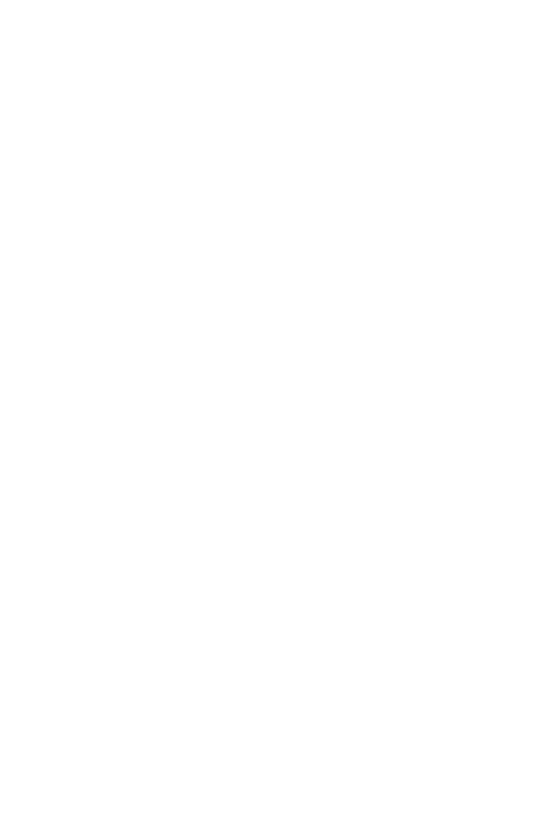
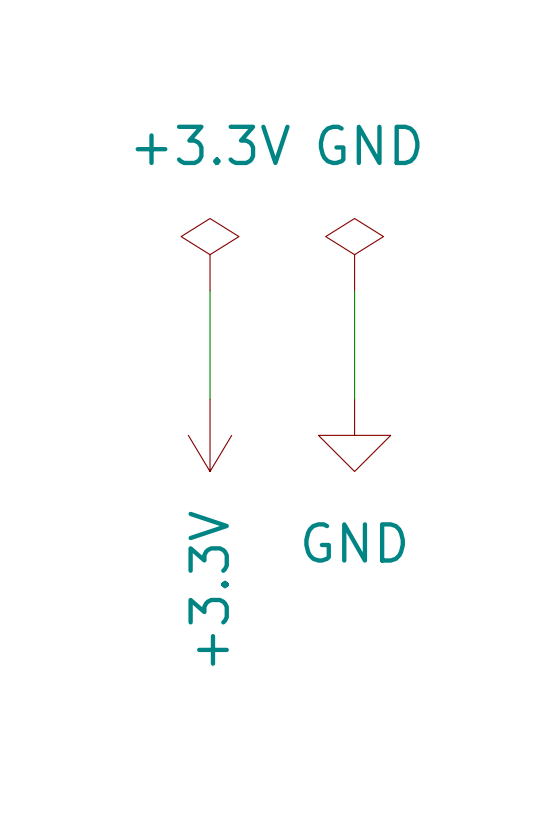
power symbol: none -> +3.3V (210, 254)
power symbol: none -> GND (354, 254)
wire: none -> (210, 290) (210, 399)
wire: none -> (354, 290) (354, 399)
power symbol: none -> +3.3V (210, 435)
power symbol: none -> GND (354, 435)

